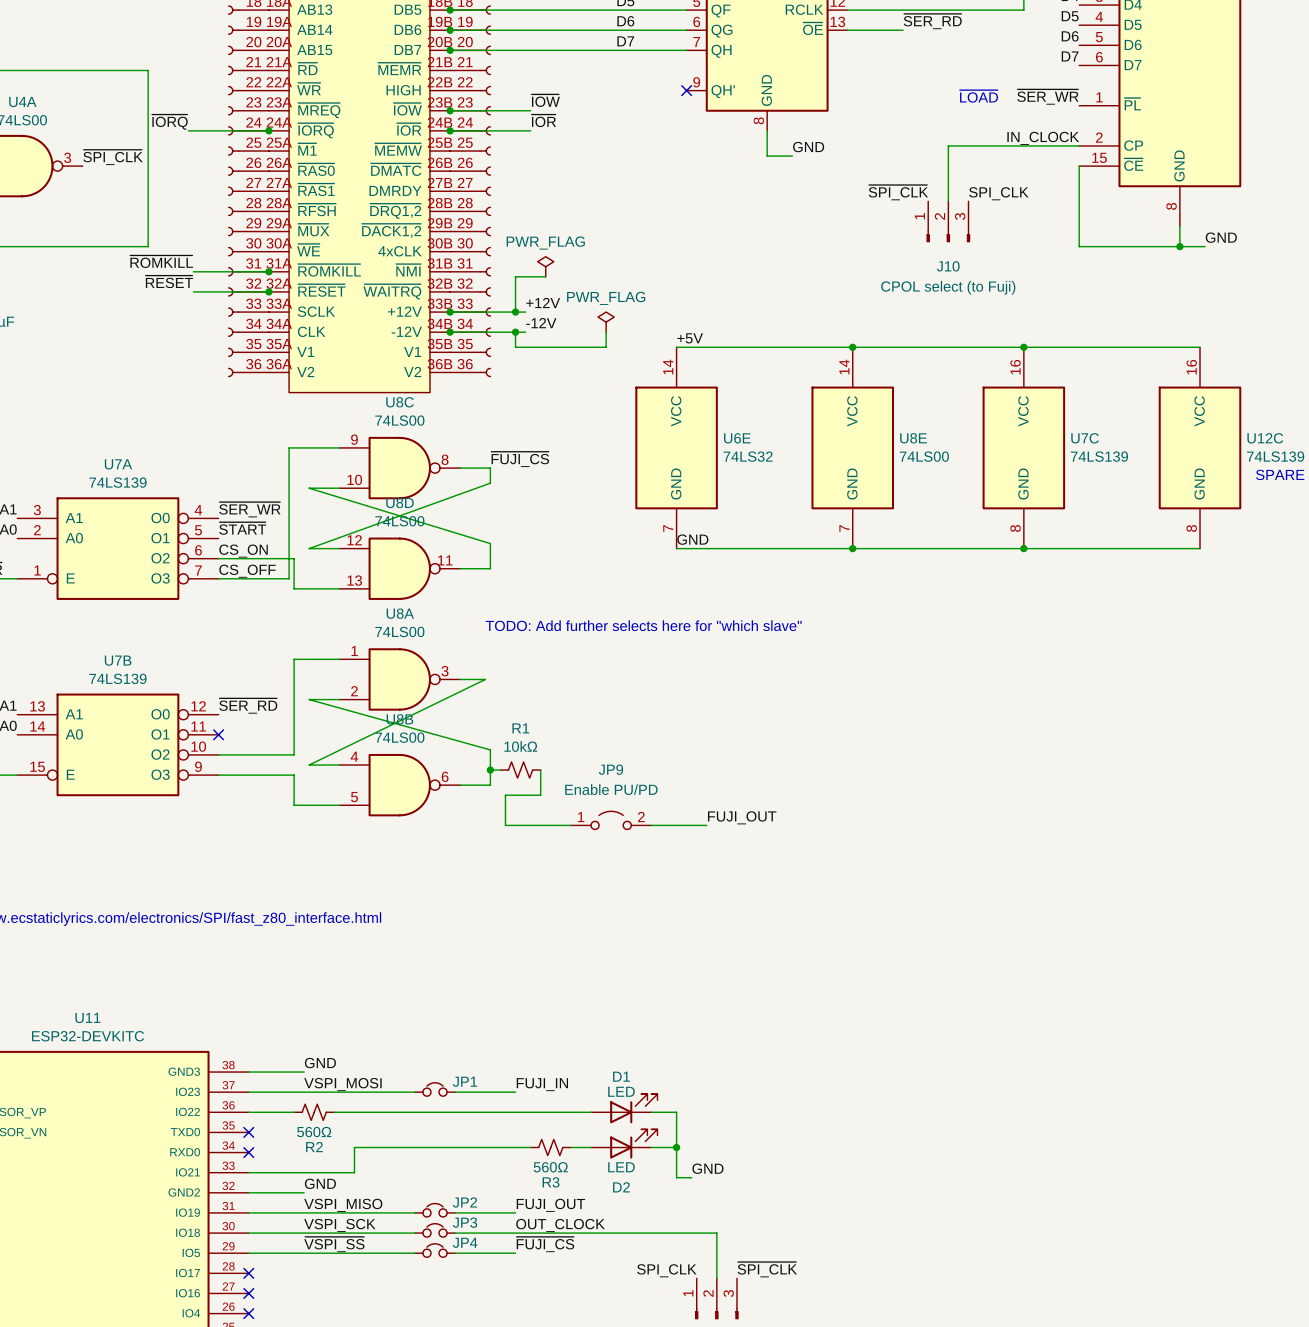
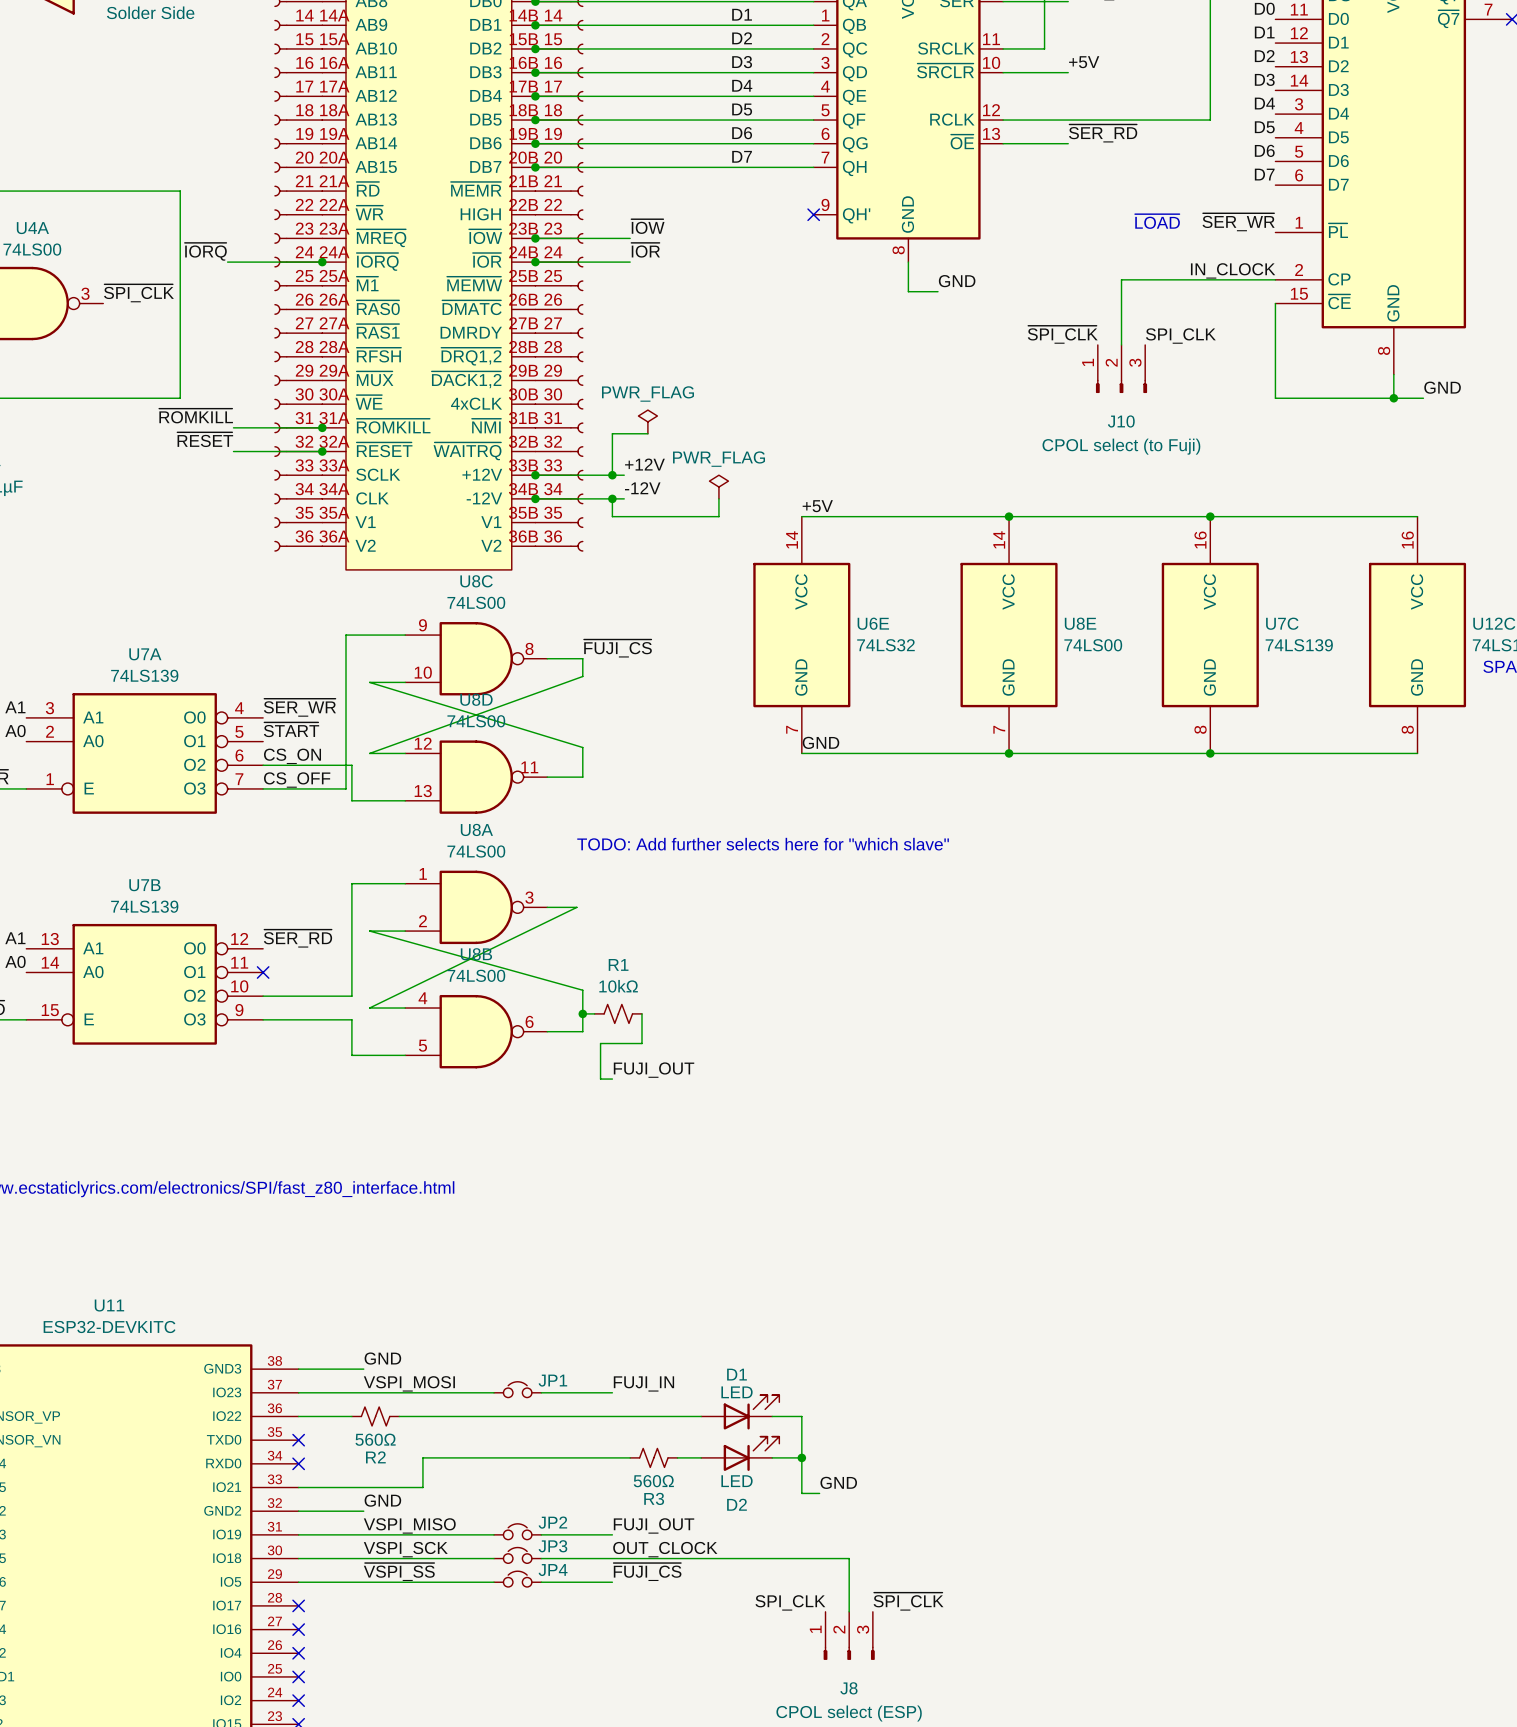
label position: FUJI_OUT (742, 817) -> FUJI_OUT (654, 1070)
JP9: Enable PU/PD (611, 820) -> none
wire: (515, 825) (570, 825) -> none
wire: (651, 825) (706, 825) -> none

